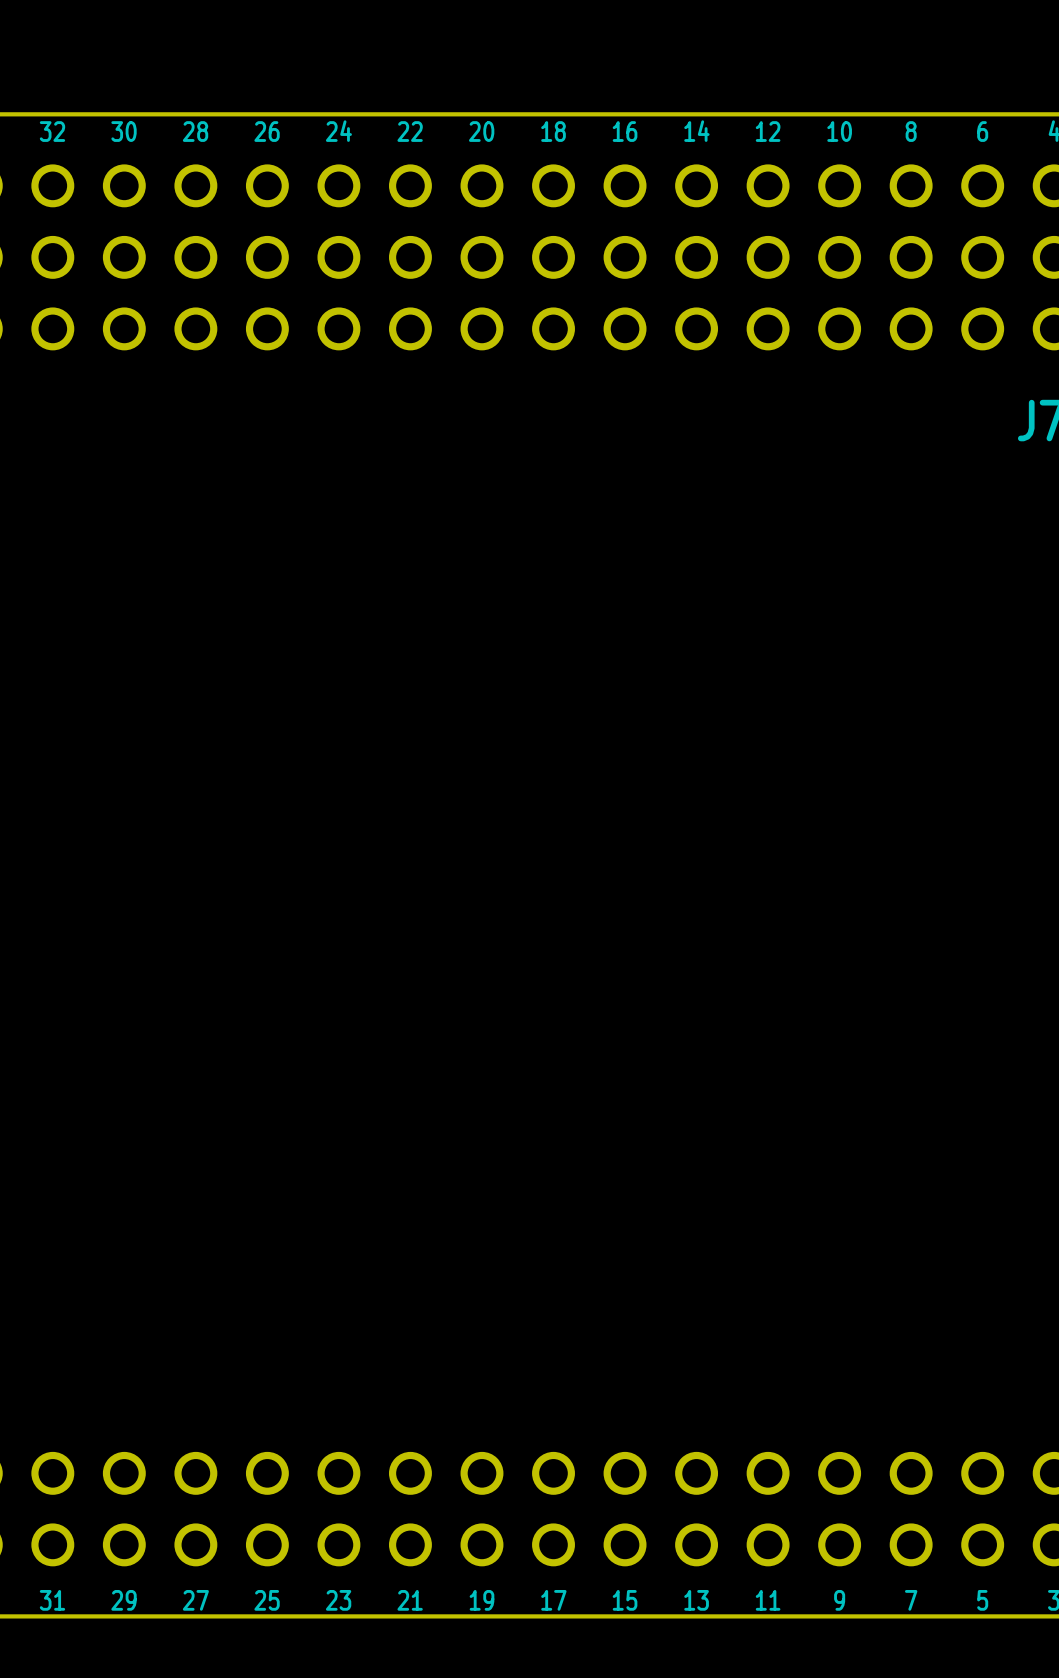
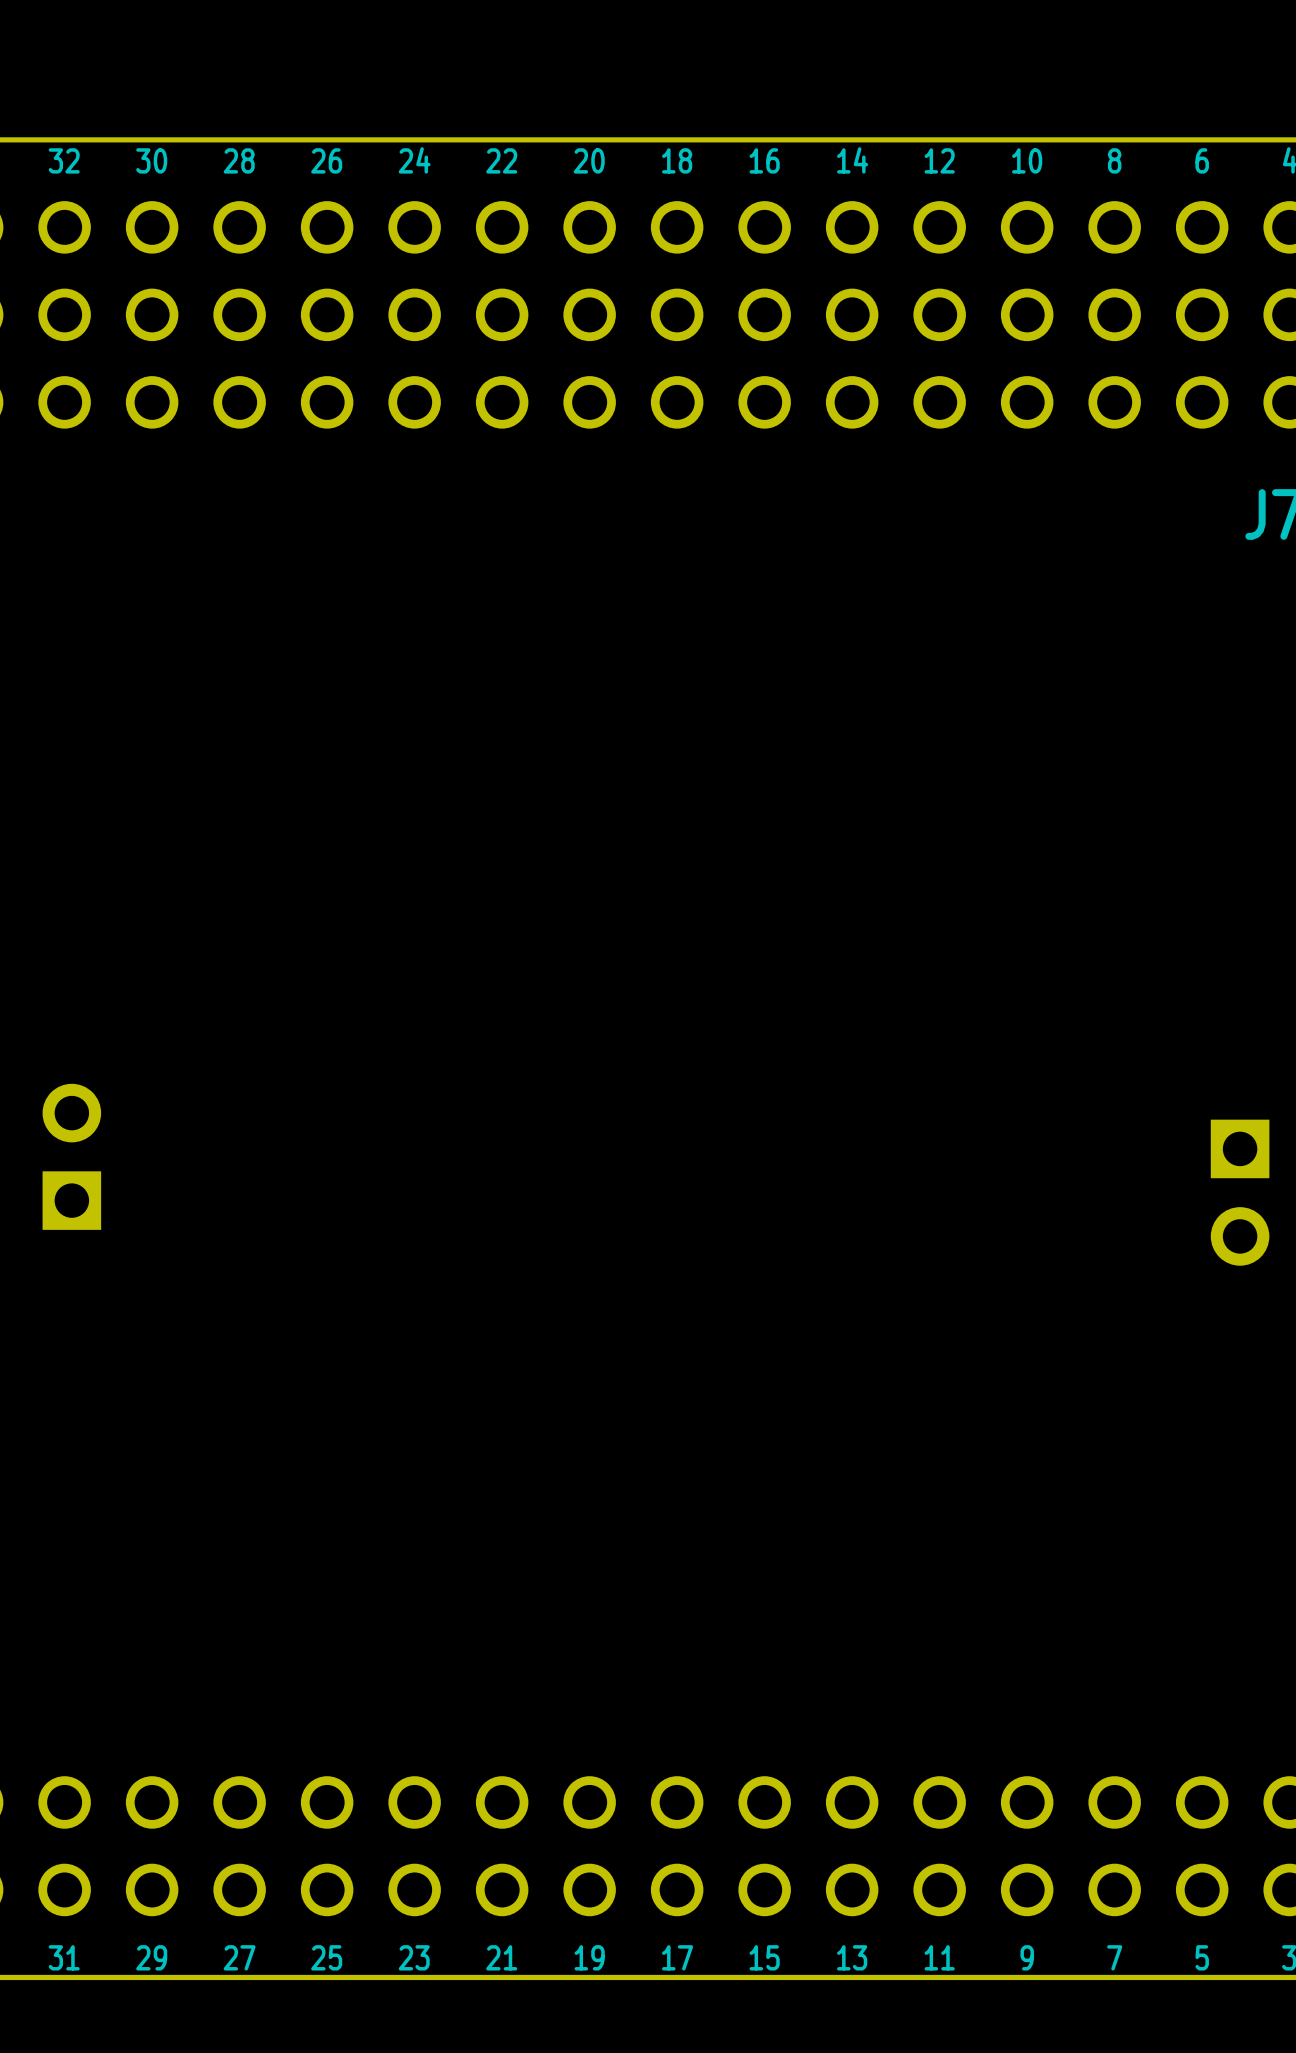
part: none -> (71, 1156)
part: none -> (1240, 1192)

